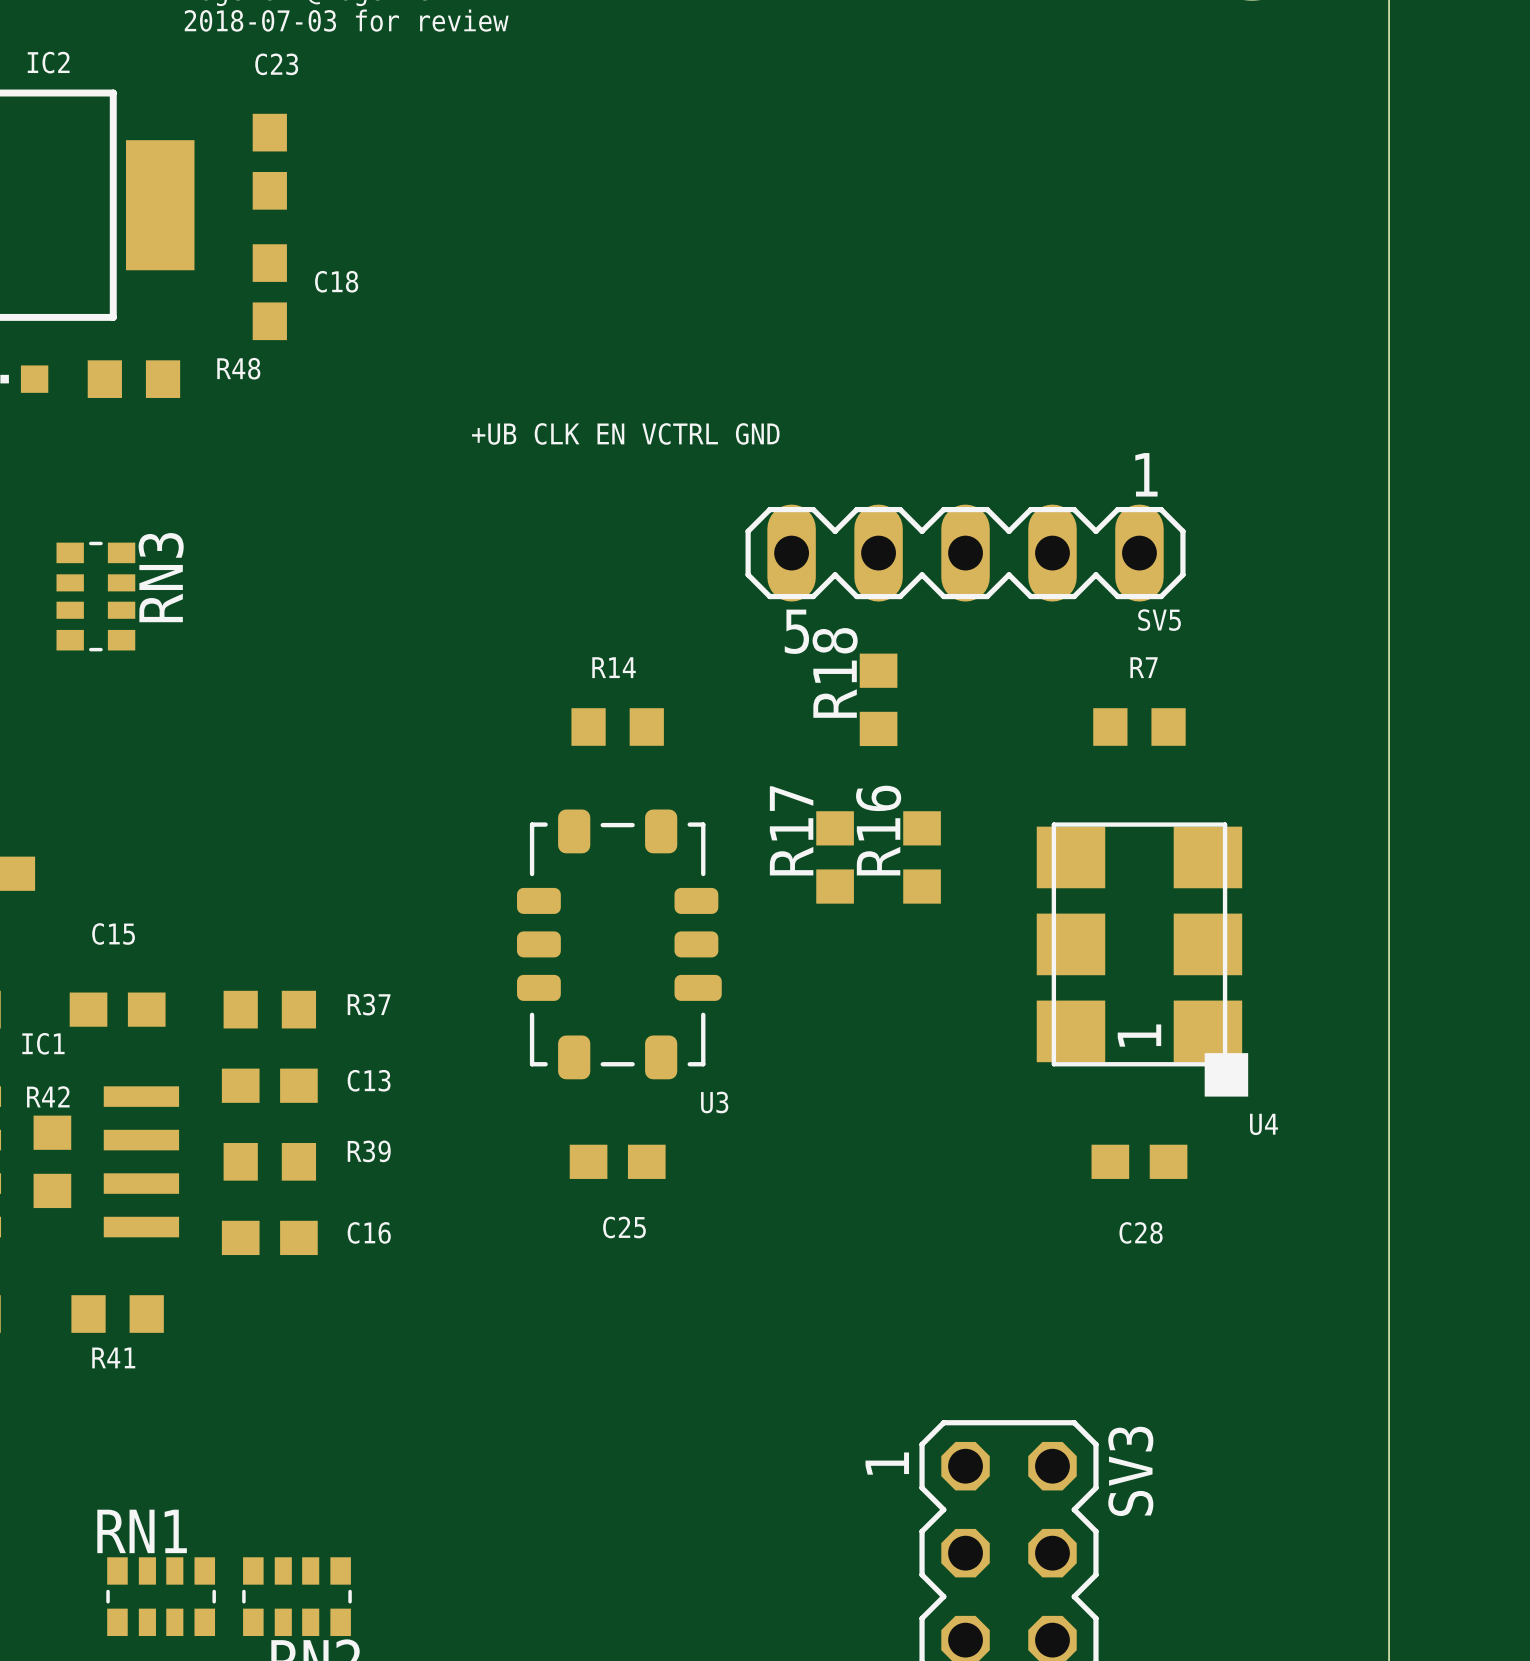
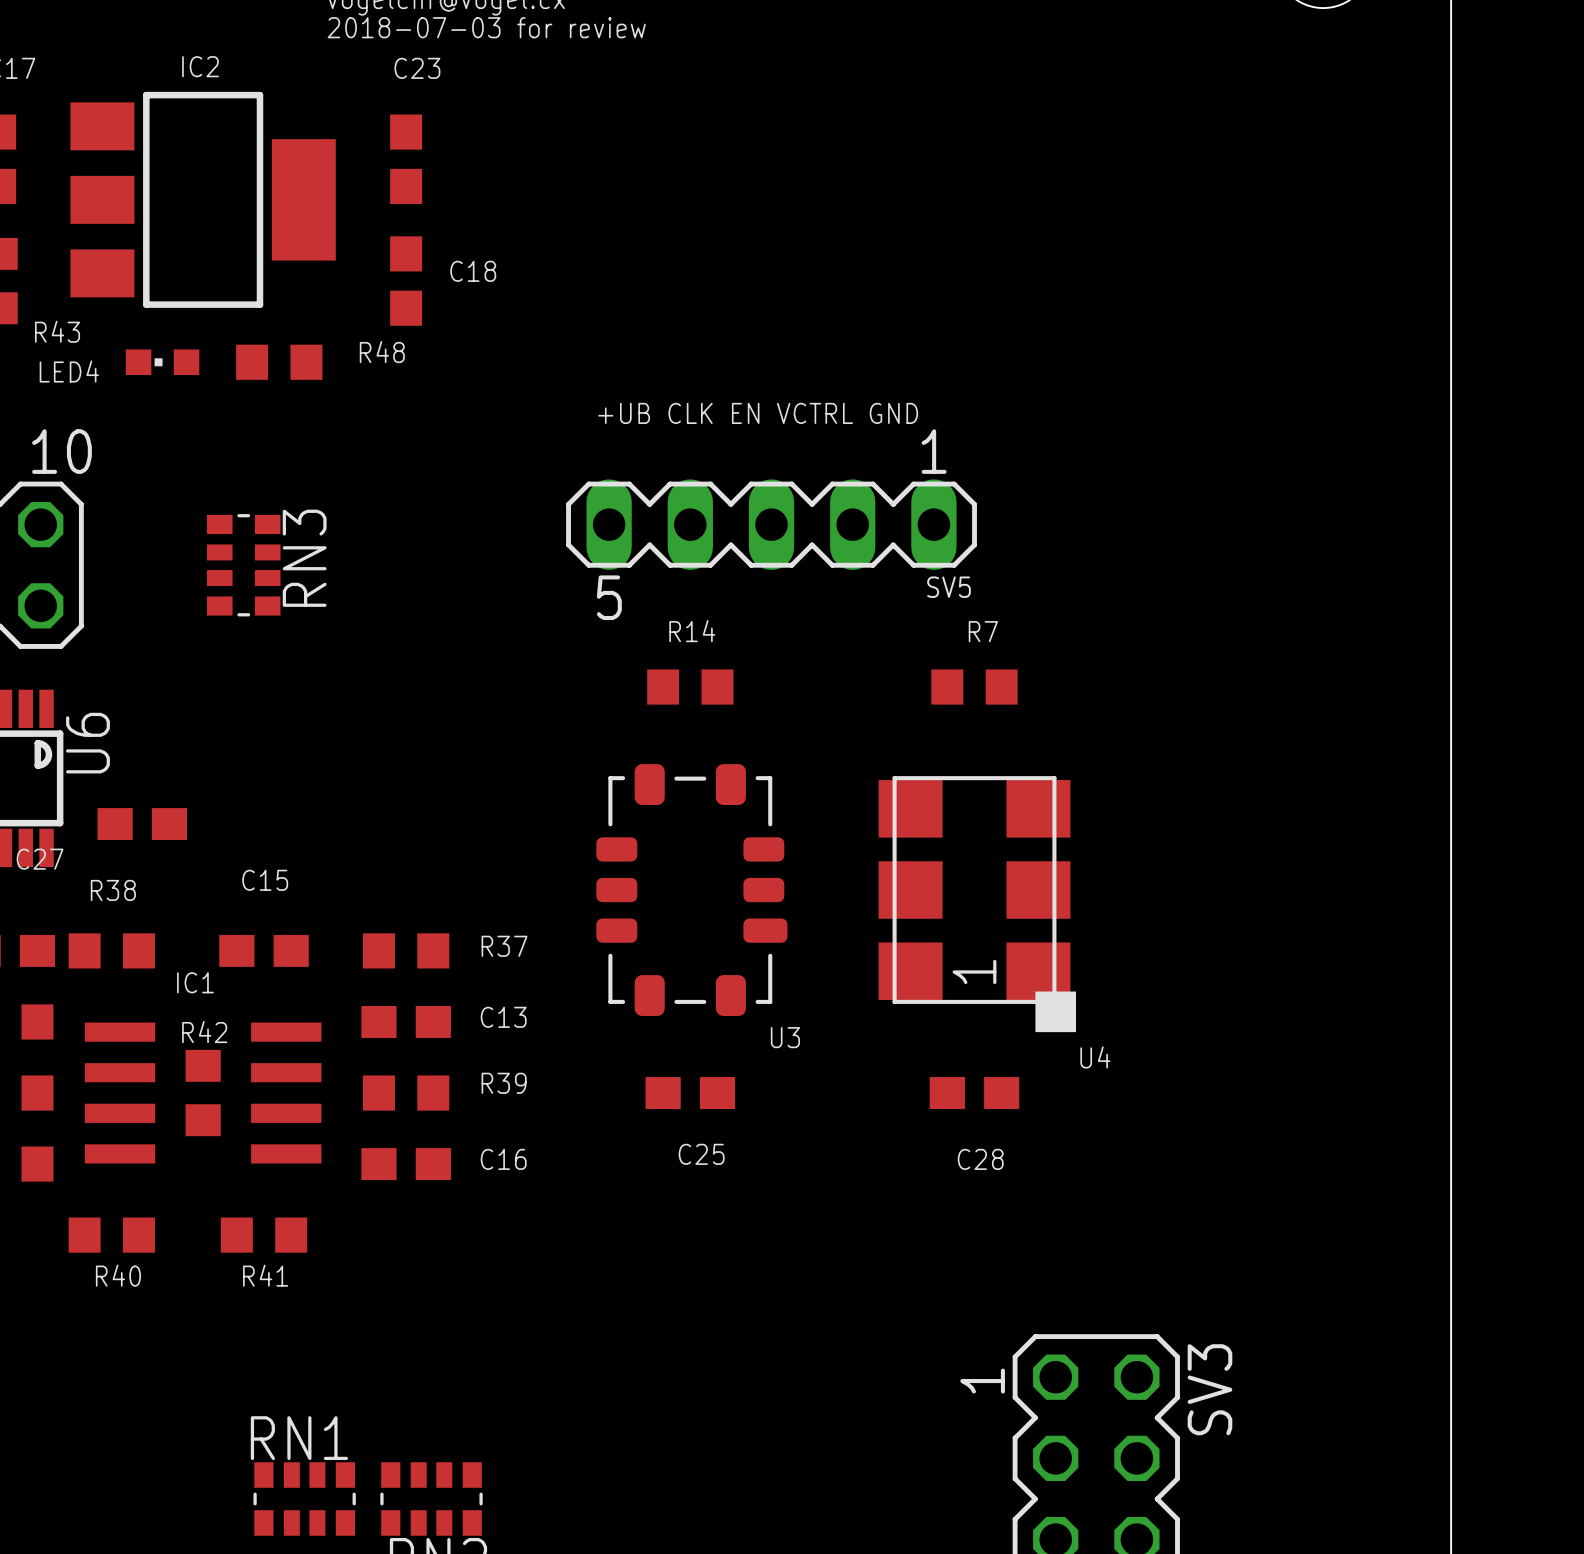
SV5 position: (965, 553) -> (771, 524)
R18: (878, 699) -> none
R14 position: (617, 727) -> (690, 687)
R7 position: (1139, 727) -> (974, 687)
R17: (835, 857) -> none
R16: (922, 857) -> none
U3 position: (619, 944) -> (691, 890)
U4 position: (1142, 959) -> (977, 904)
C25 position: (617, 1161) -> (690, 1093)
C28 position: (1139, 1161) -> (974, 1093)

